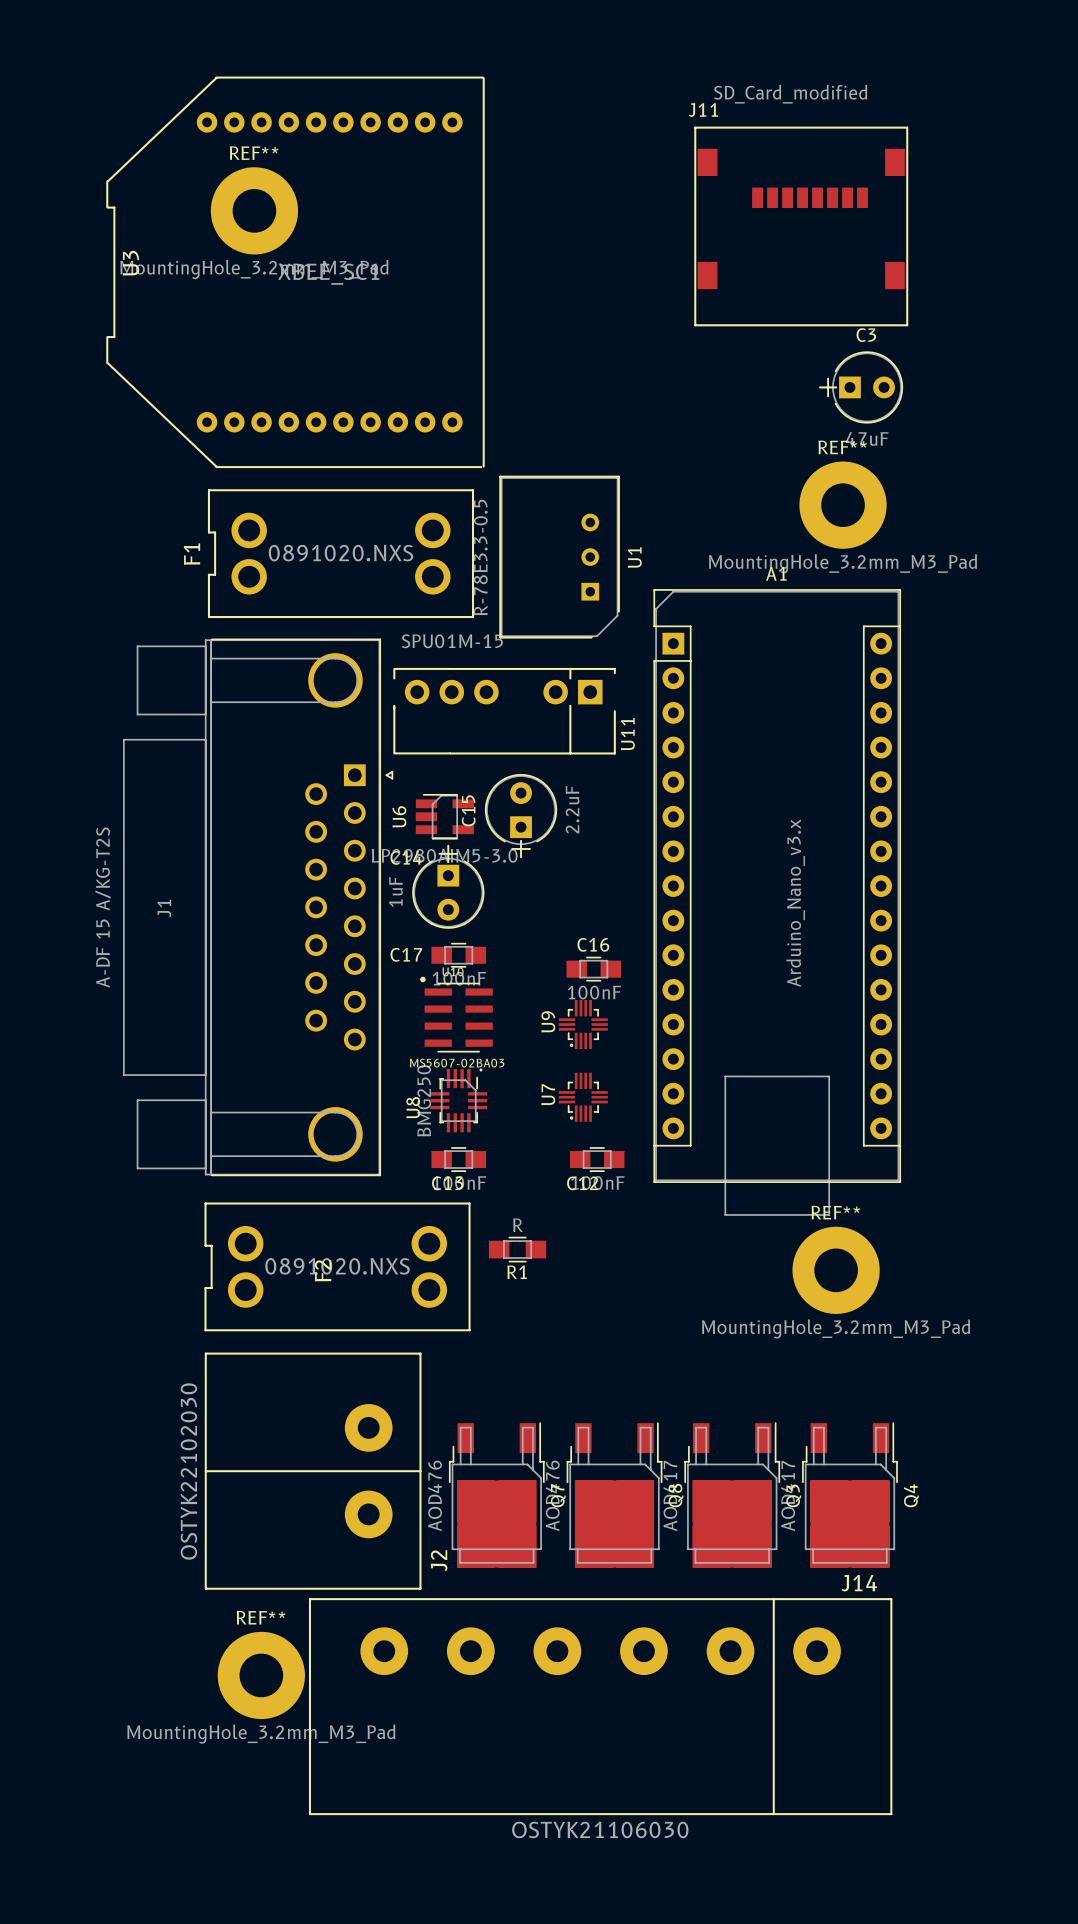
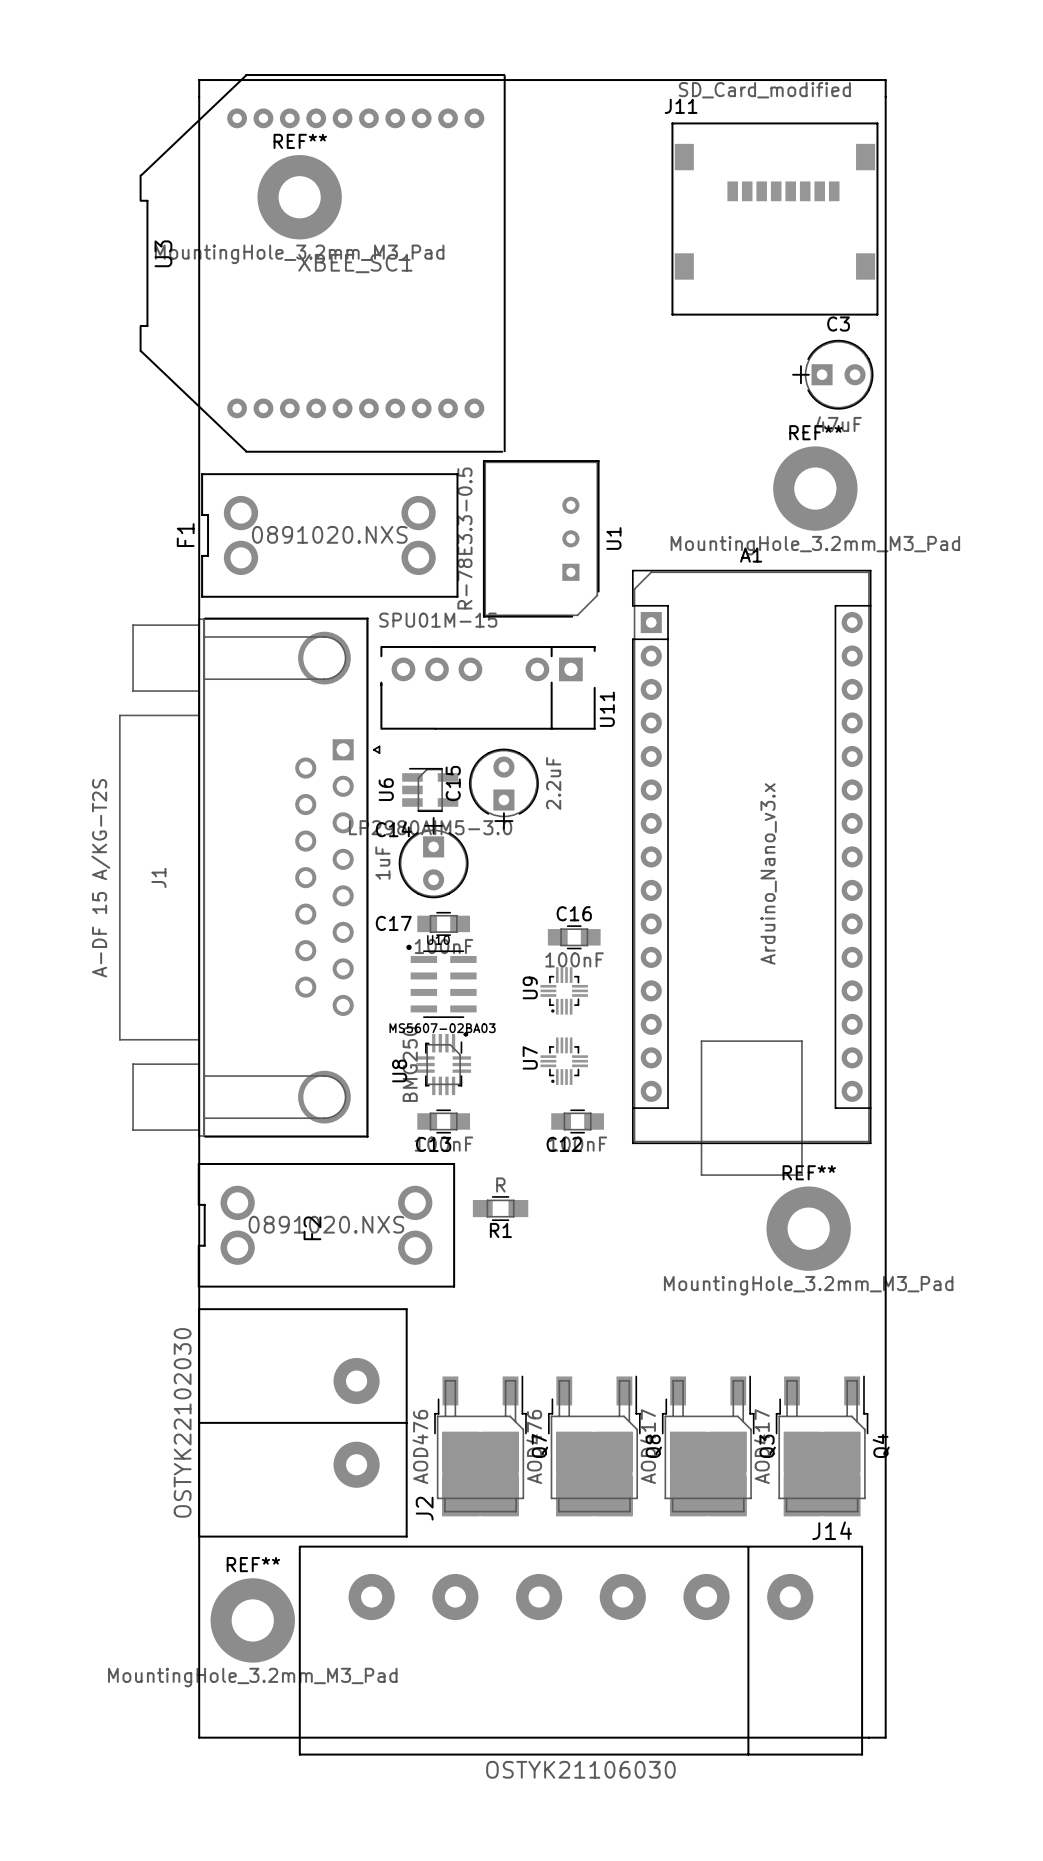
board edge: none -> (199, 80) (199, 1737) (885, 1737) (885, 80) (199, 80)
REF** position: (254, 210) -> (299, 197)
U3 position: (295, 272) -> (322, 263)

